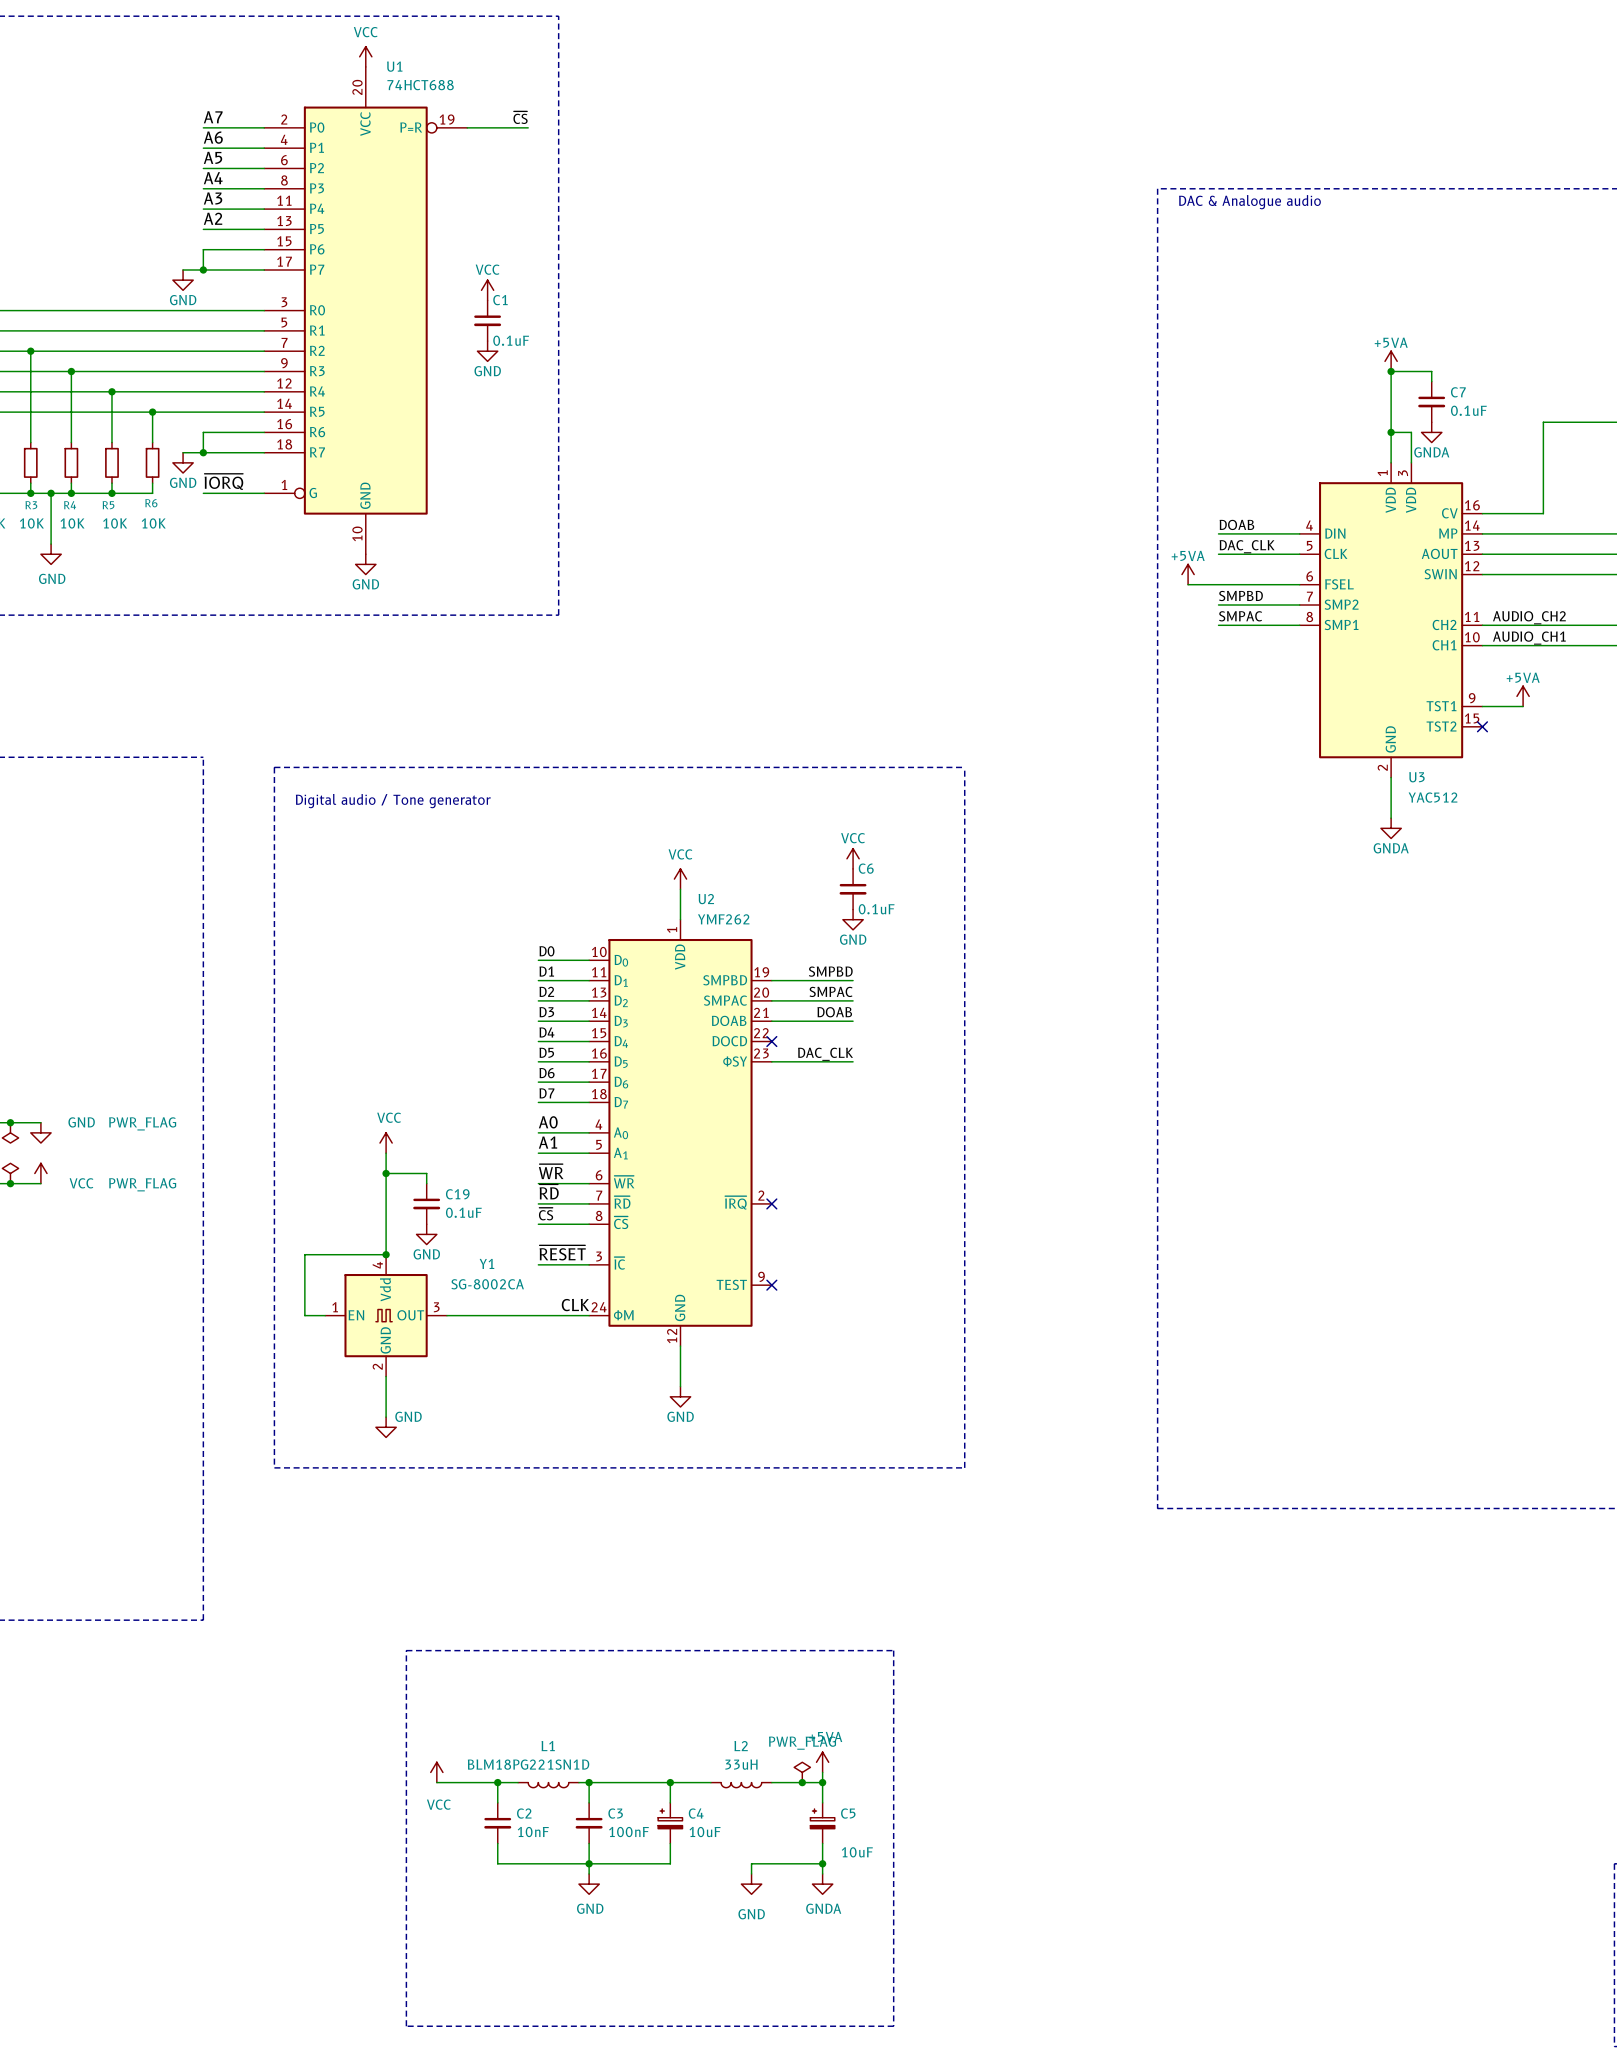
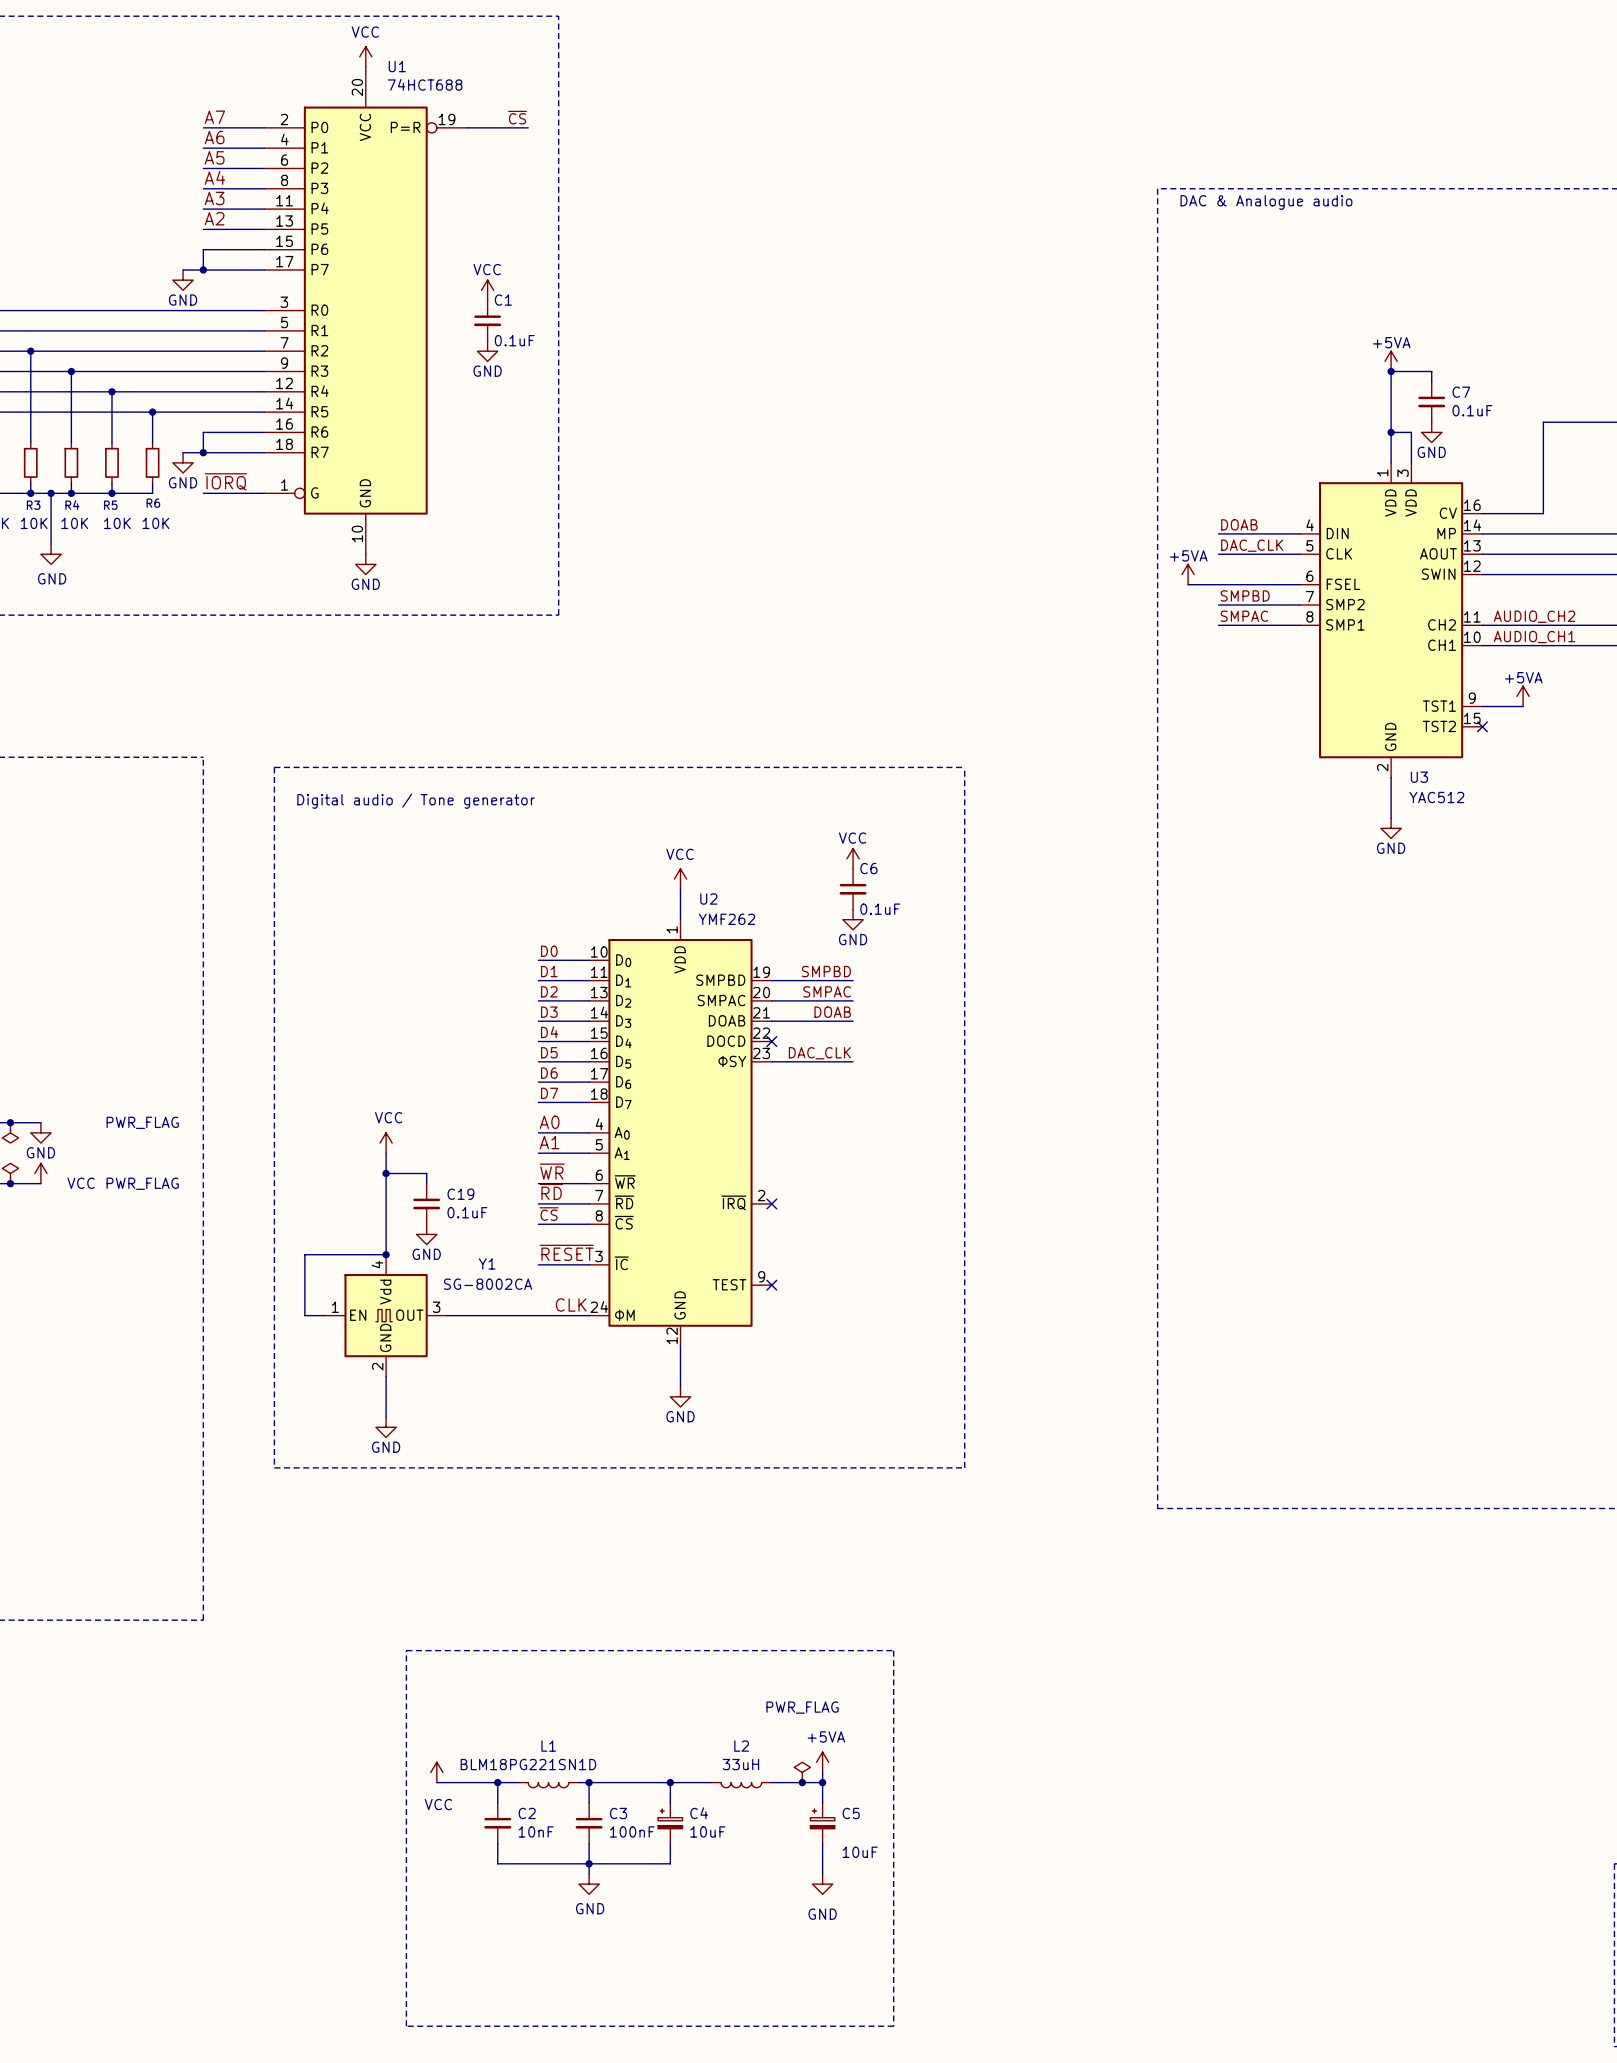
power symbol: GNDA (1431, 432) -> GND (1431, 432)
power symbol: GNDA (1391, 828) -> GND (1391, 828)
power symbol text position: GND (81, 1122) -> GND (40, 1152)
power symbol text position: GND (408, 1416) -> GND (386, 1447)
power symbol text position: PWR_FLAG (802, 1743) -> PWR_FLAG (802, 1707)
wire: (822, 1863) (751, 1863) (751, 1873) -> none
junction: (822, 1863) -> none
power symbol: GND (751, 1884) -> none
power symbol: GNDA (822, 1884) -> GND (822, 1884)

